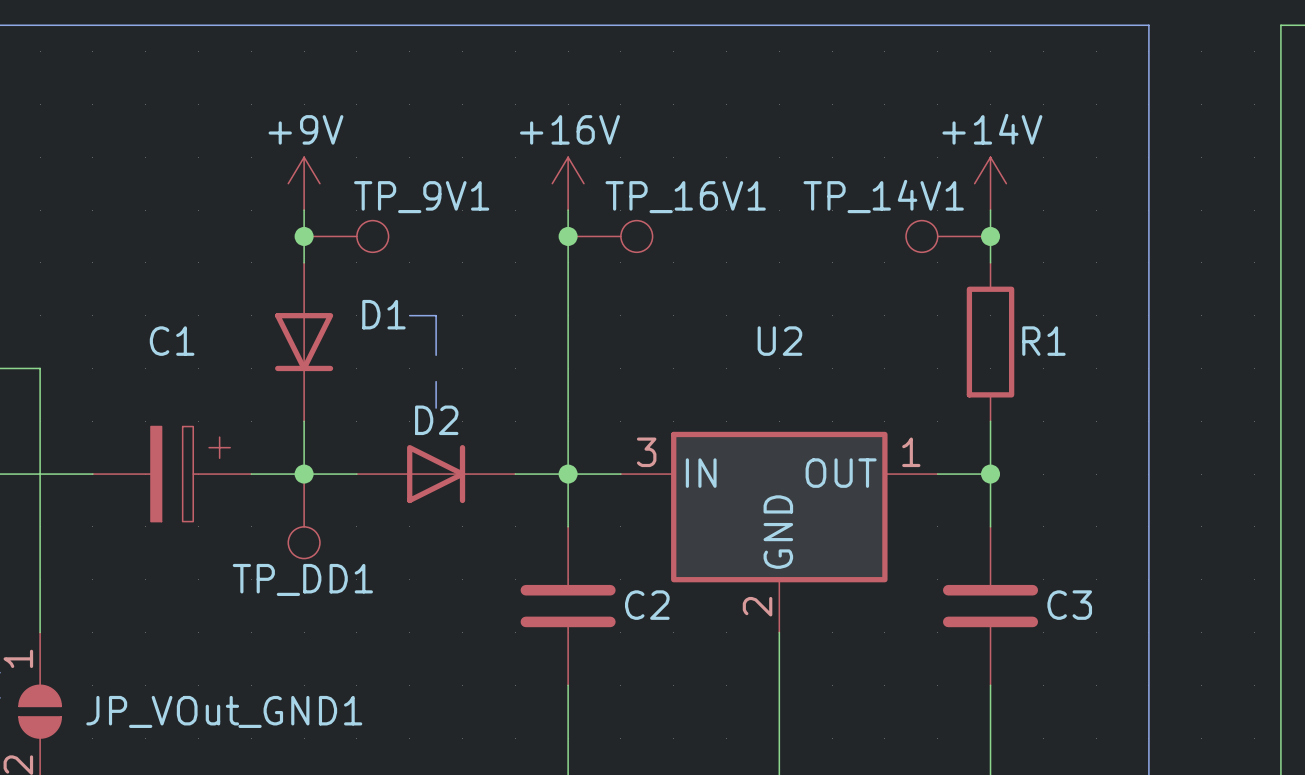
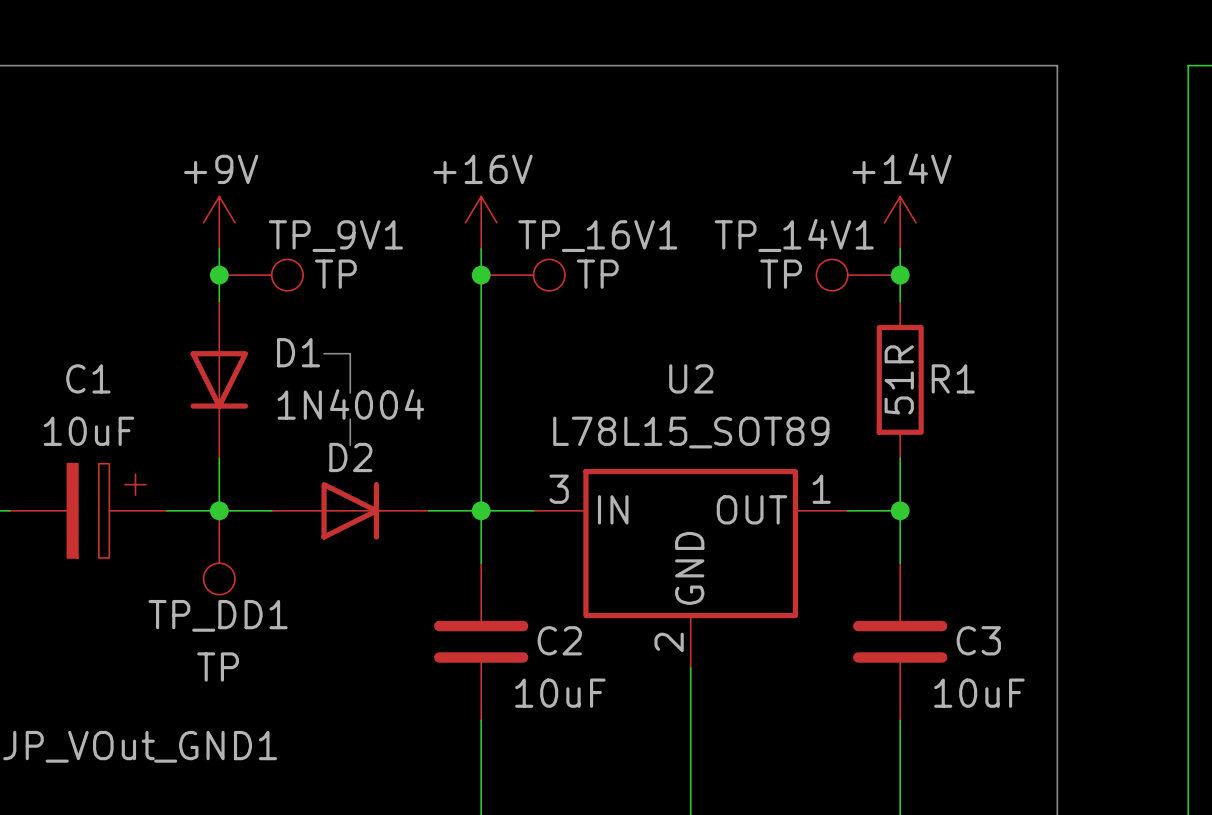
TP_9V1 value: none -> TP (335, 274)
TP_16V1 value: none -> TP (597, 274)
TP_14V1 value: none -> TP (781, 274)
R1 value: none -> 51R (899, 379)
D1 value: none -> 1N4004 (350, 404)
C1 value: none -> 10uF (88, 431)
U2 value: none -> L78L15_SOT89 (691, 432)
TP_DD1 value: none -> TP (218, 666)
C2 value: none -> 10uF (560, 693)
C3 value: none -> 10uF (979, 693)

